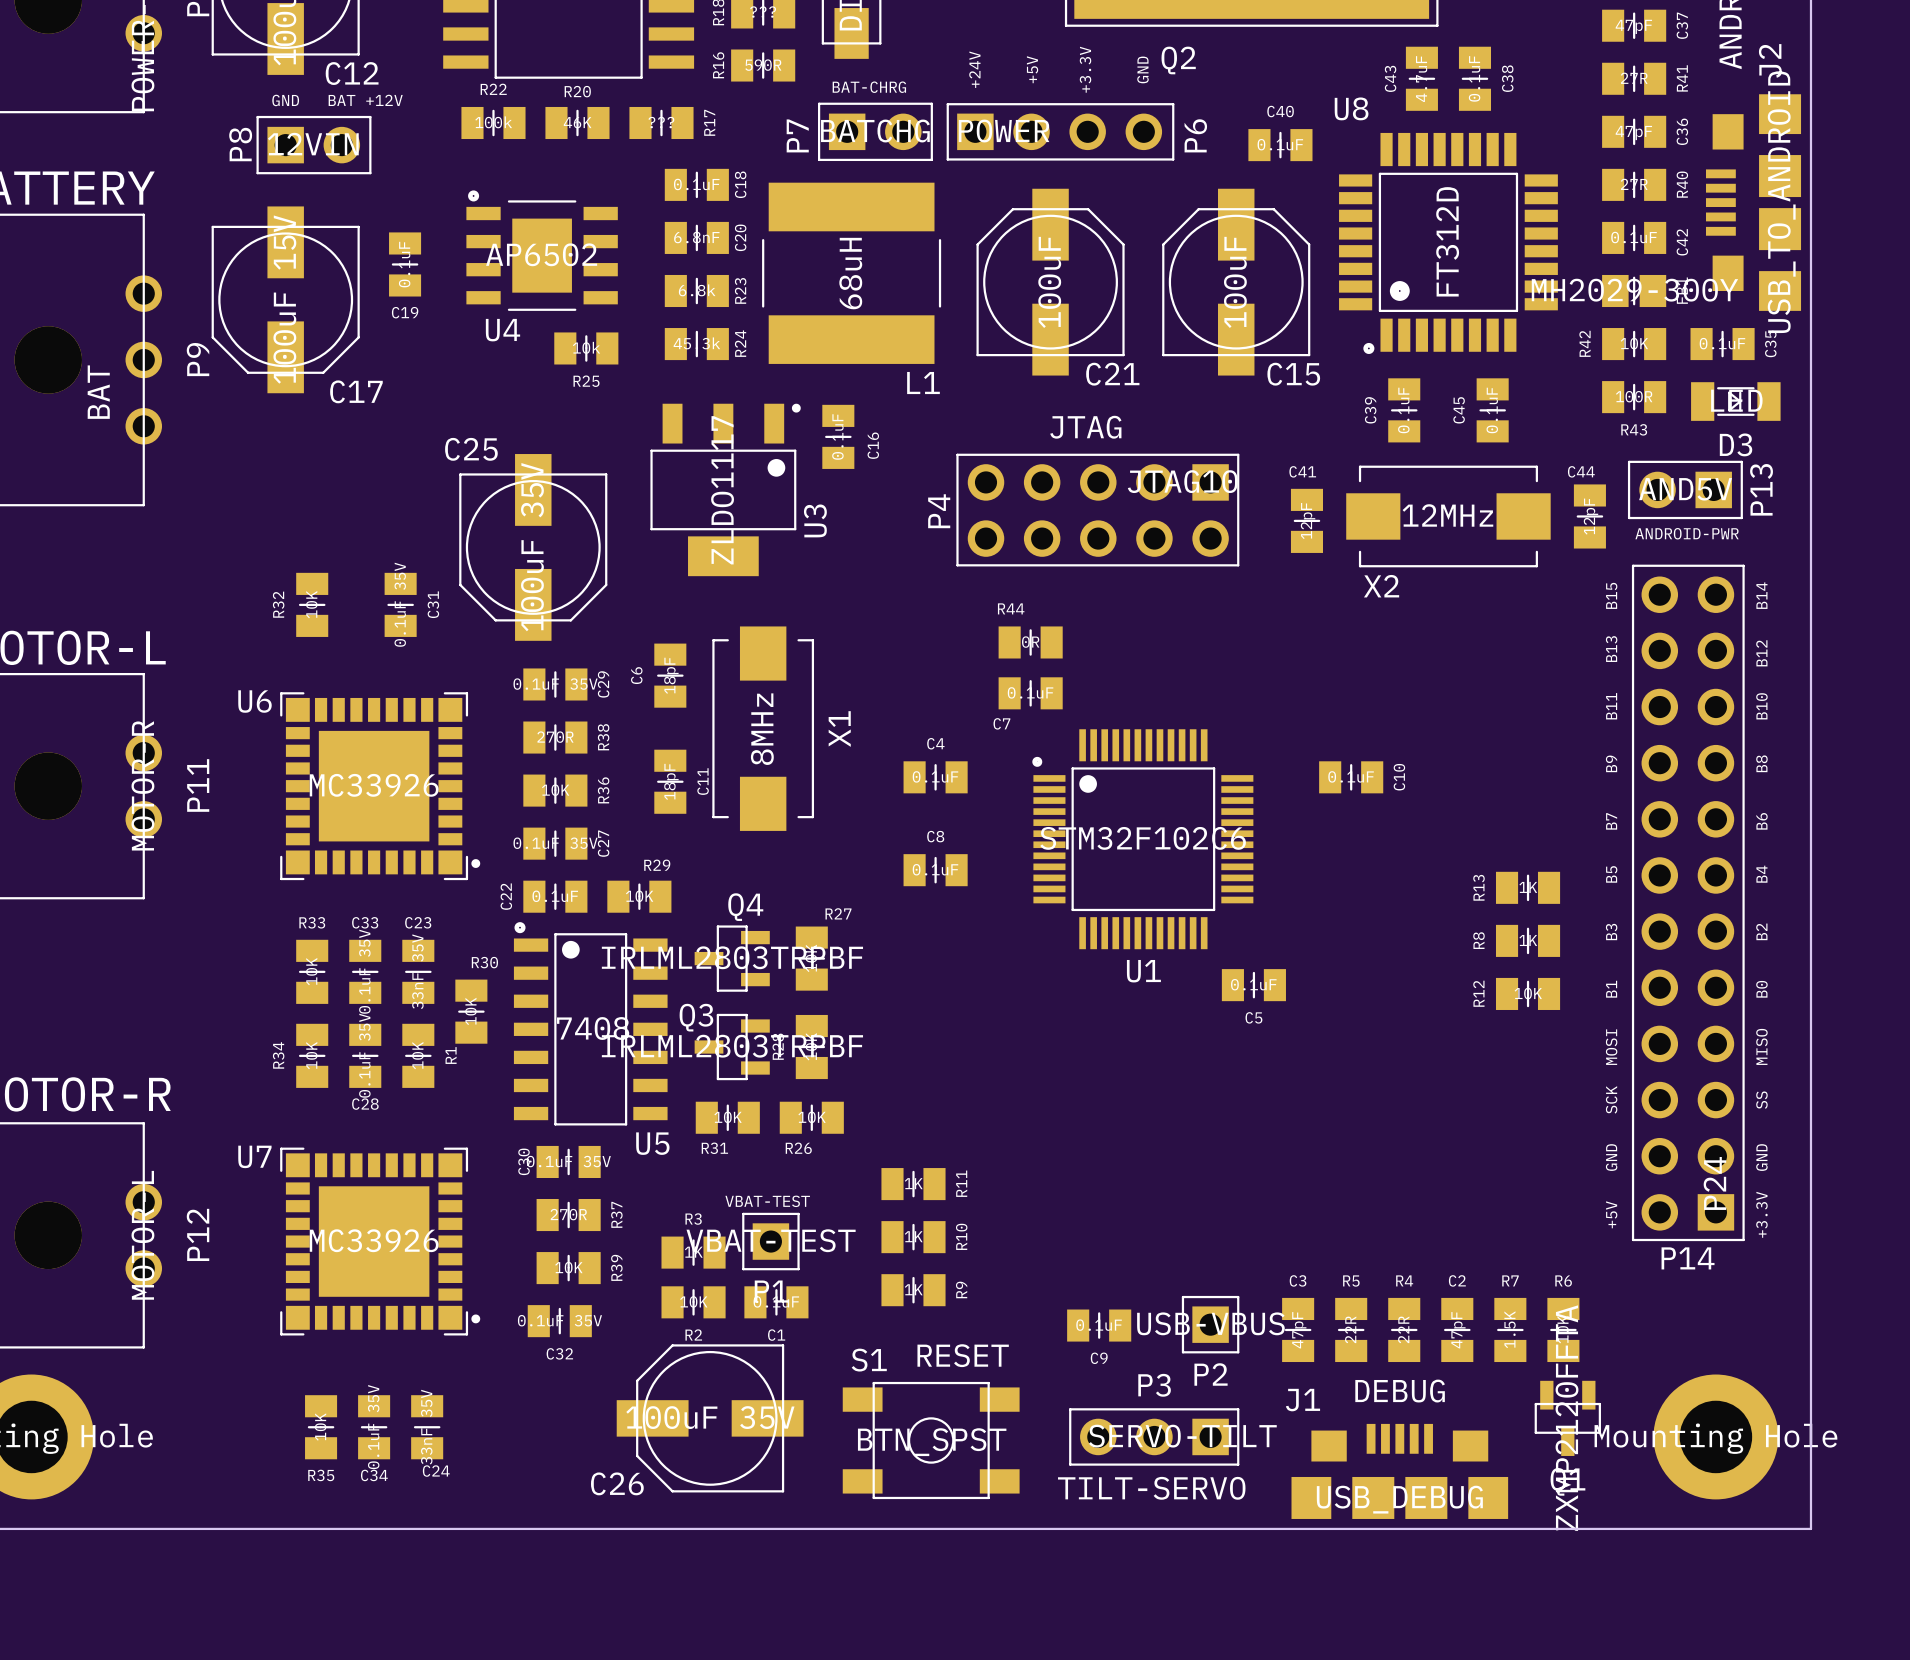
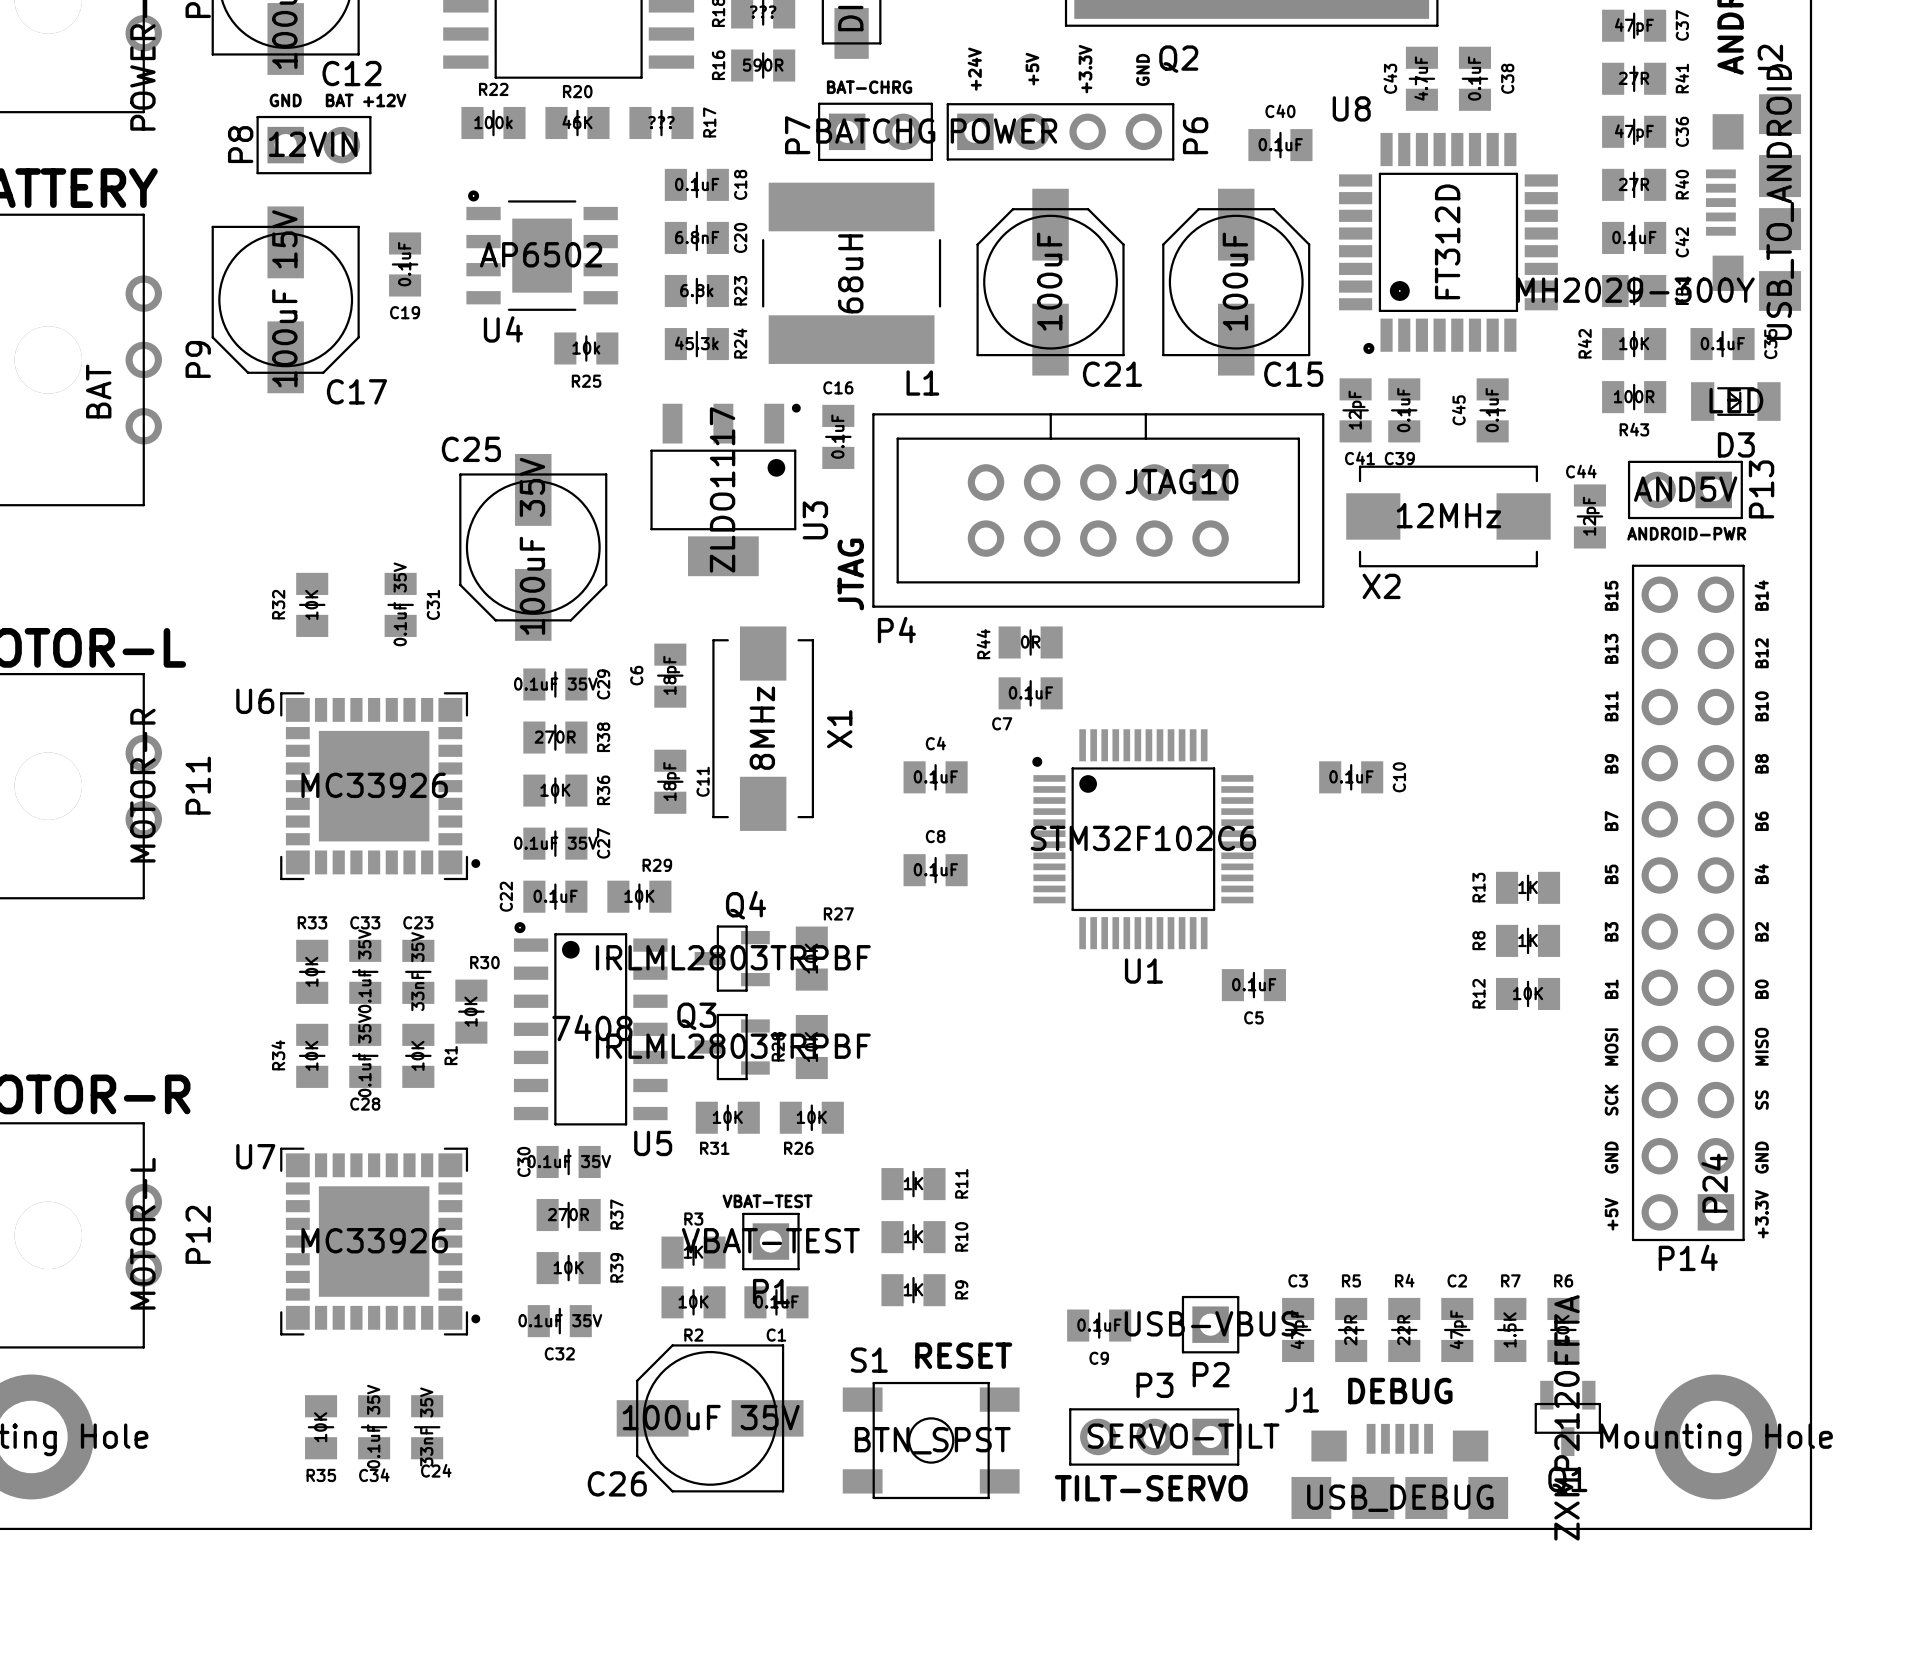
C39 name rotation: 0° (1370, 410) -> 90° clockwise (1399, 458)
C39 name position: C39 (1370, 410) -> C39 (1399, 458)
text rotation: 0° (1085, 427) -> 90° counterclockwise (850, 574)
text position: JTAG (1085, 427) -> JTAG (850, 574)
C16 name rotation: 0° (873, 445) -> 90° clockwise (838, 387)
C16 name position: C16 (873, 445) -> C16 (838, 387)
P4 footprint: [956, 453, 1240, 567] -> [872, 413, 1325, 608]
C41 name position: C41 (1302, 471) -> C41 (1360, 458)
P4 name position: P4 (939, 511) -> P4 (896, 630)
C41 position: (1306, 520) -> (1355, 410)
R44 name rotation: 0° (1011, 608) -> 90° counterclockwise (983, 644)
R44 name position: R44 (1011, 608) -> R44 (983, 644)

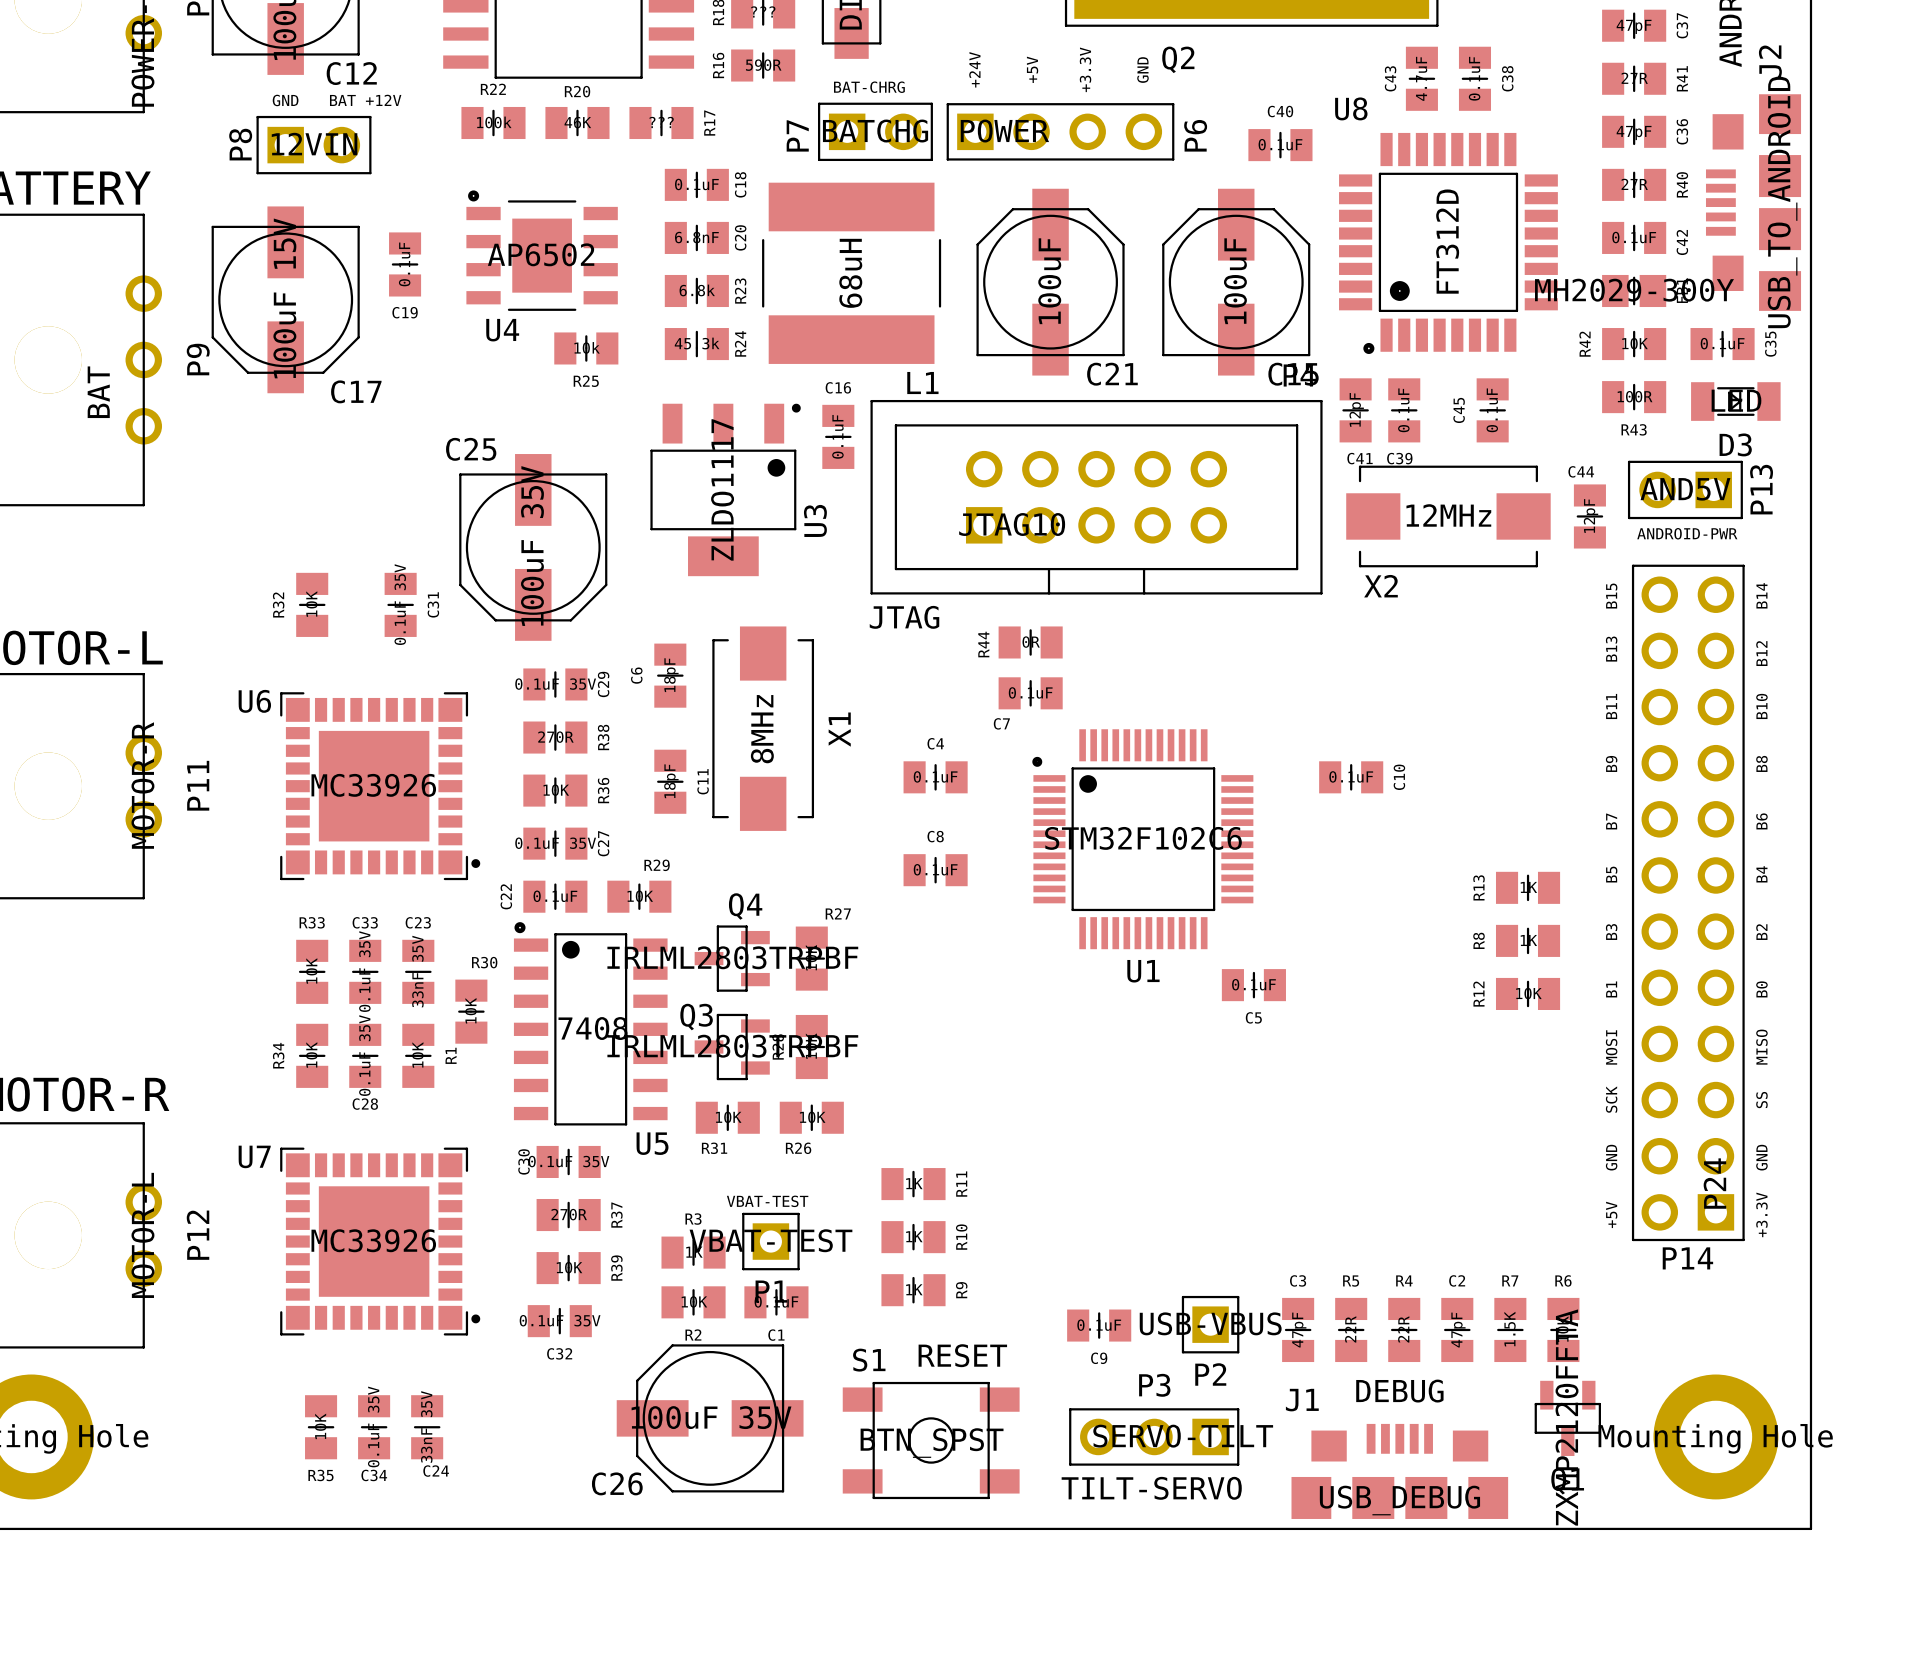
P4 rotation: 0° (1098, 510) -> 180° (1096, 497)
text rotation: 0° (850, 574) -> 90° clockwise (904, 617)

